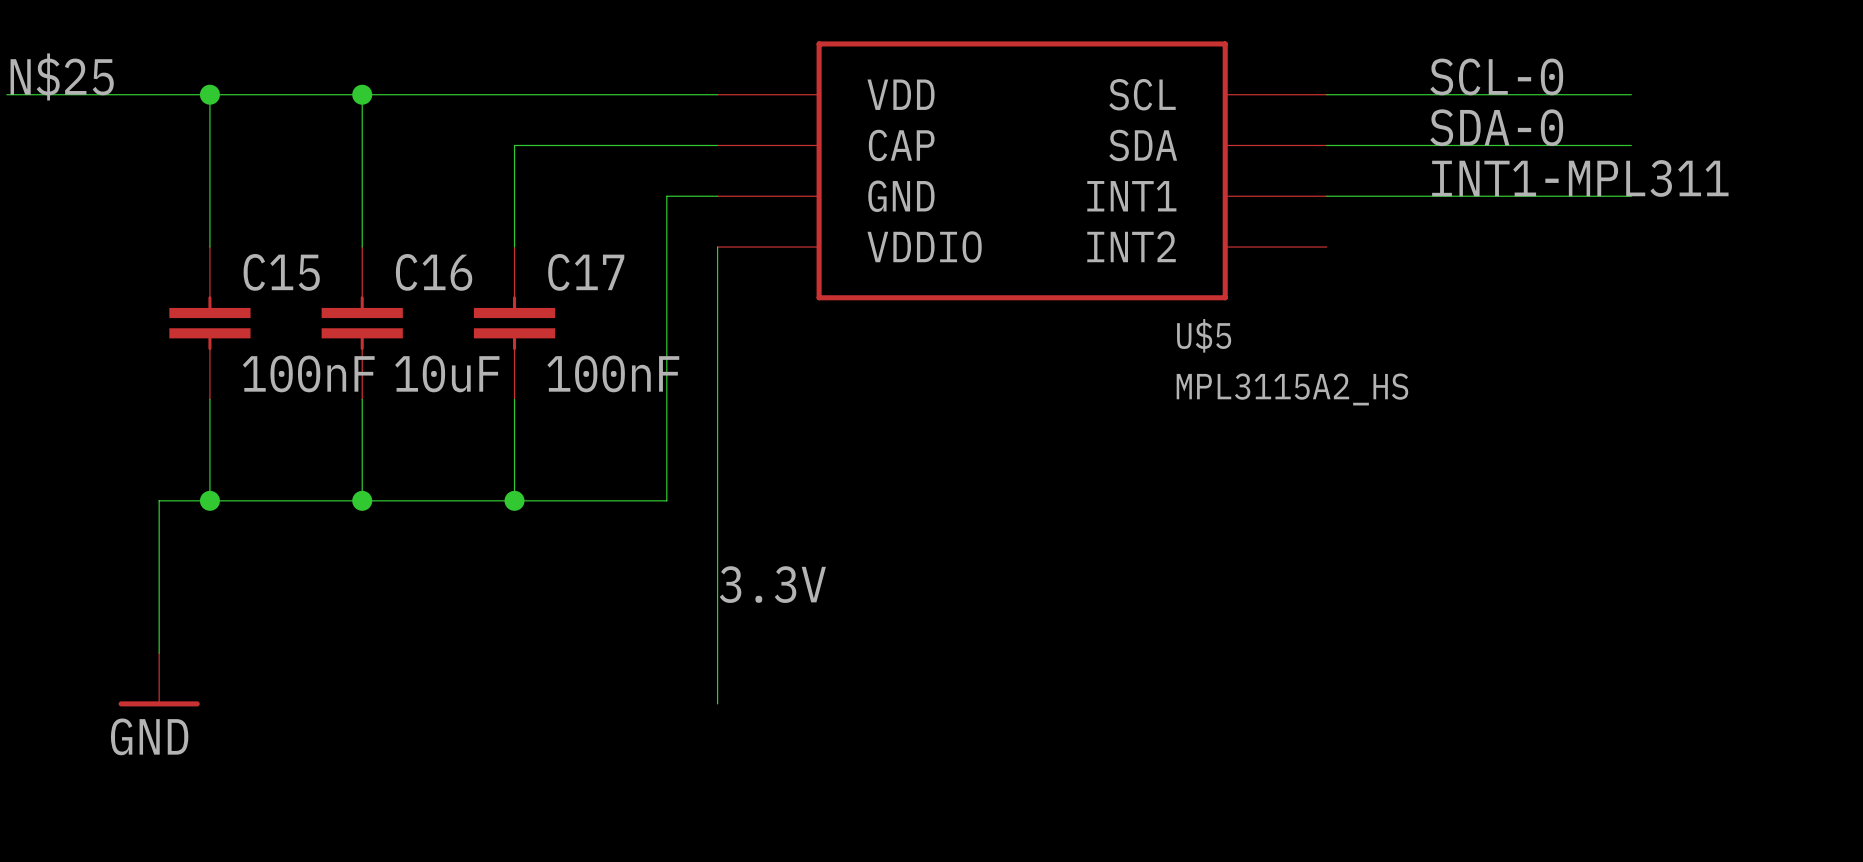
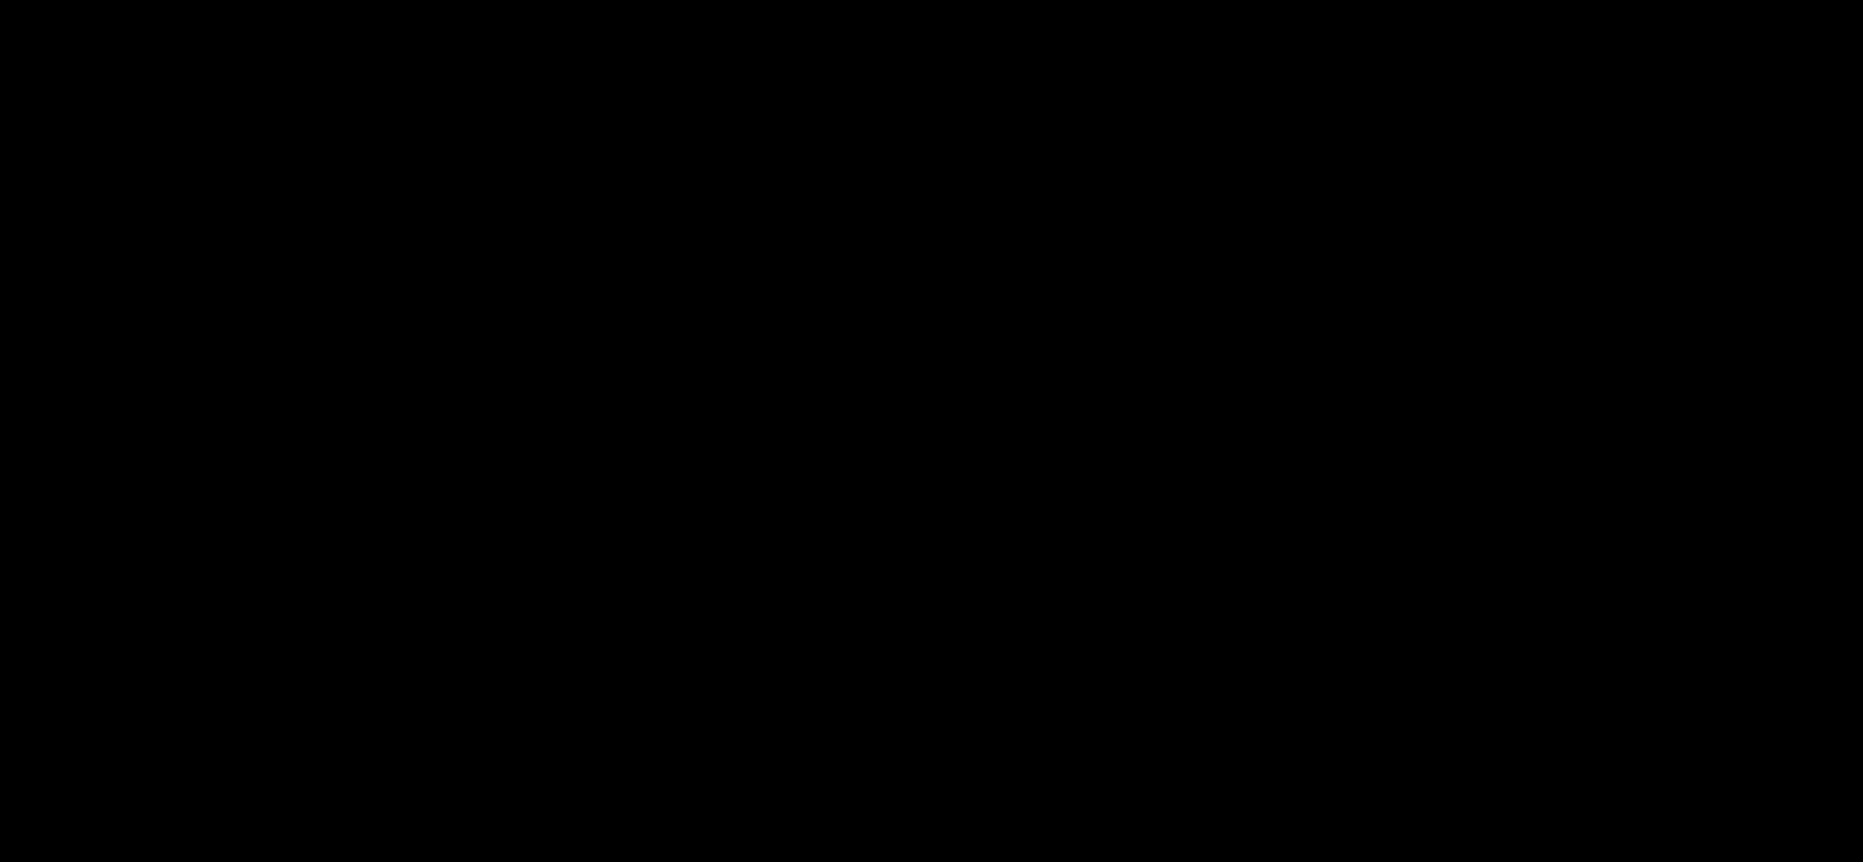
label: N$25 (62, 76) -> none
label: SCL-0 (1496, 76) -> none
wire: (6, 94) (717, 94) -> none
wire: (209, 94) (209, 247) -> none
junction: (209, 94) -> none
wire: (362, 94) (362, 247) -> none
junction: (362, 94) -> none
wire: (1326, 94) (1631, 94) -> none
label: SDA-0 (1496, 127) -> none
wire: (717, 145) (514, 145) (514, 247) -> none
wire: (1326, 145) (1631, 145) -> none
U$5: MPL3115A2_HS (1022, 170) -> none
label: INT1-MPL311 (1580, 178) -> none
wire: (717, 196) (666, 196) (666, 500) (159, 500) (159, 653) -> none
wire: (1326, 196) (1631, 196) -> none
wire: (717, 247) (717, 703) -> none
C15: 100nF (209, 323) -> none
C16: 10uF (362, 323) -> none
C17: 100nF (514, 323) -> none
wire: (209, 399) (209, 500) -> none
wire: (362, 399) (362, 500) -> none
wire: (514, 399) (514, 500) -> none
junction: (209, 500) -> none
junction: (362, 500) -> none
junction: (514, 500) -> none
label: 3.3V (772, 584) -> none
power symbol: GND (159, 679) -> none

